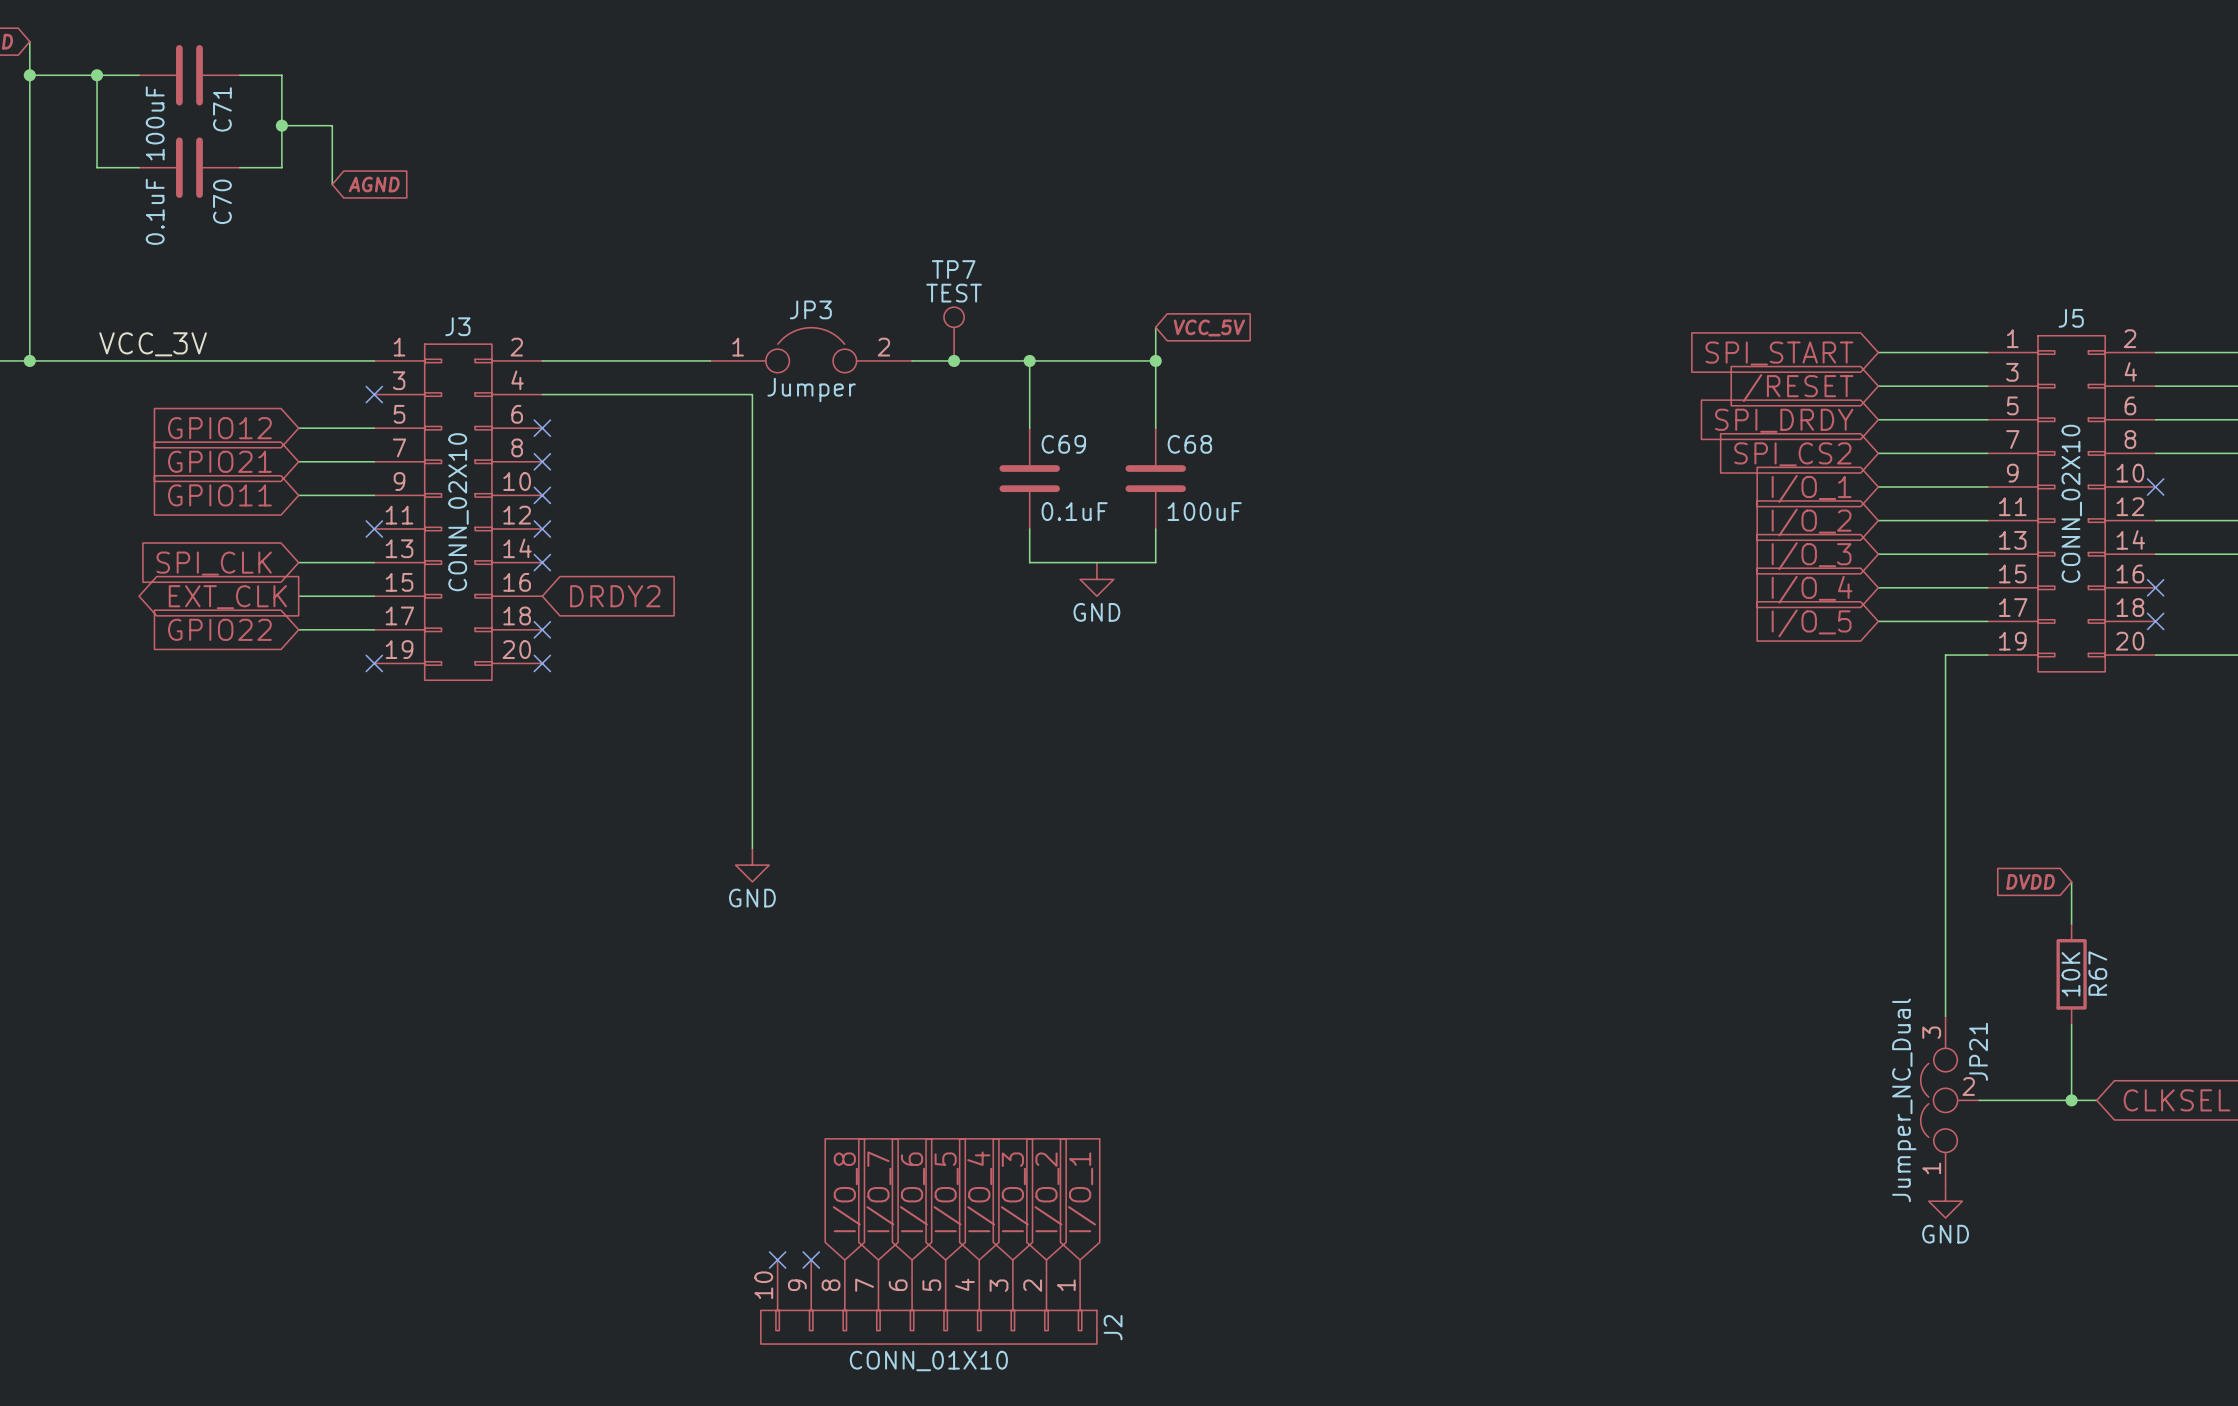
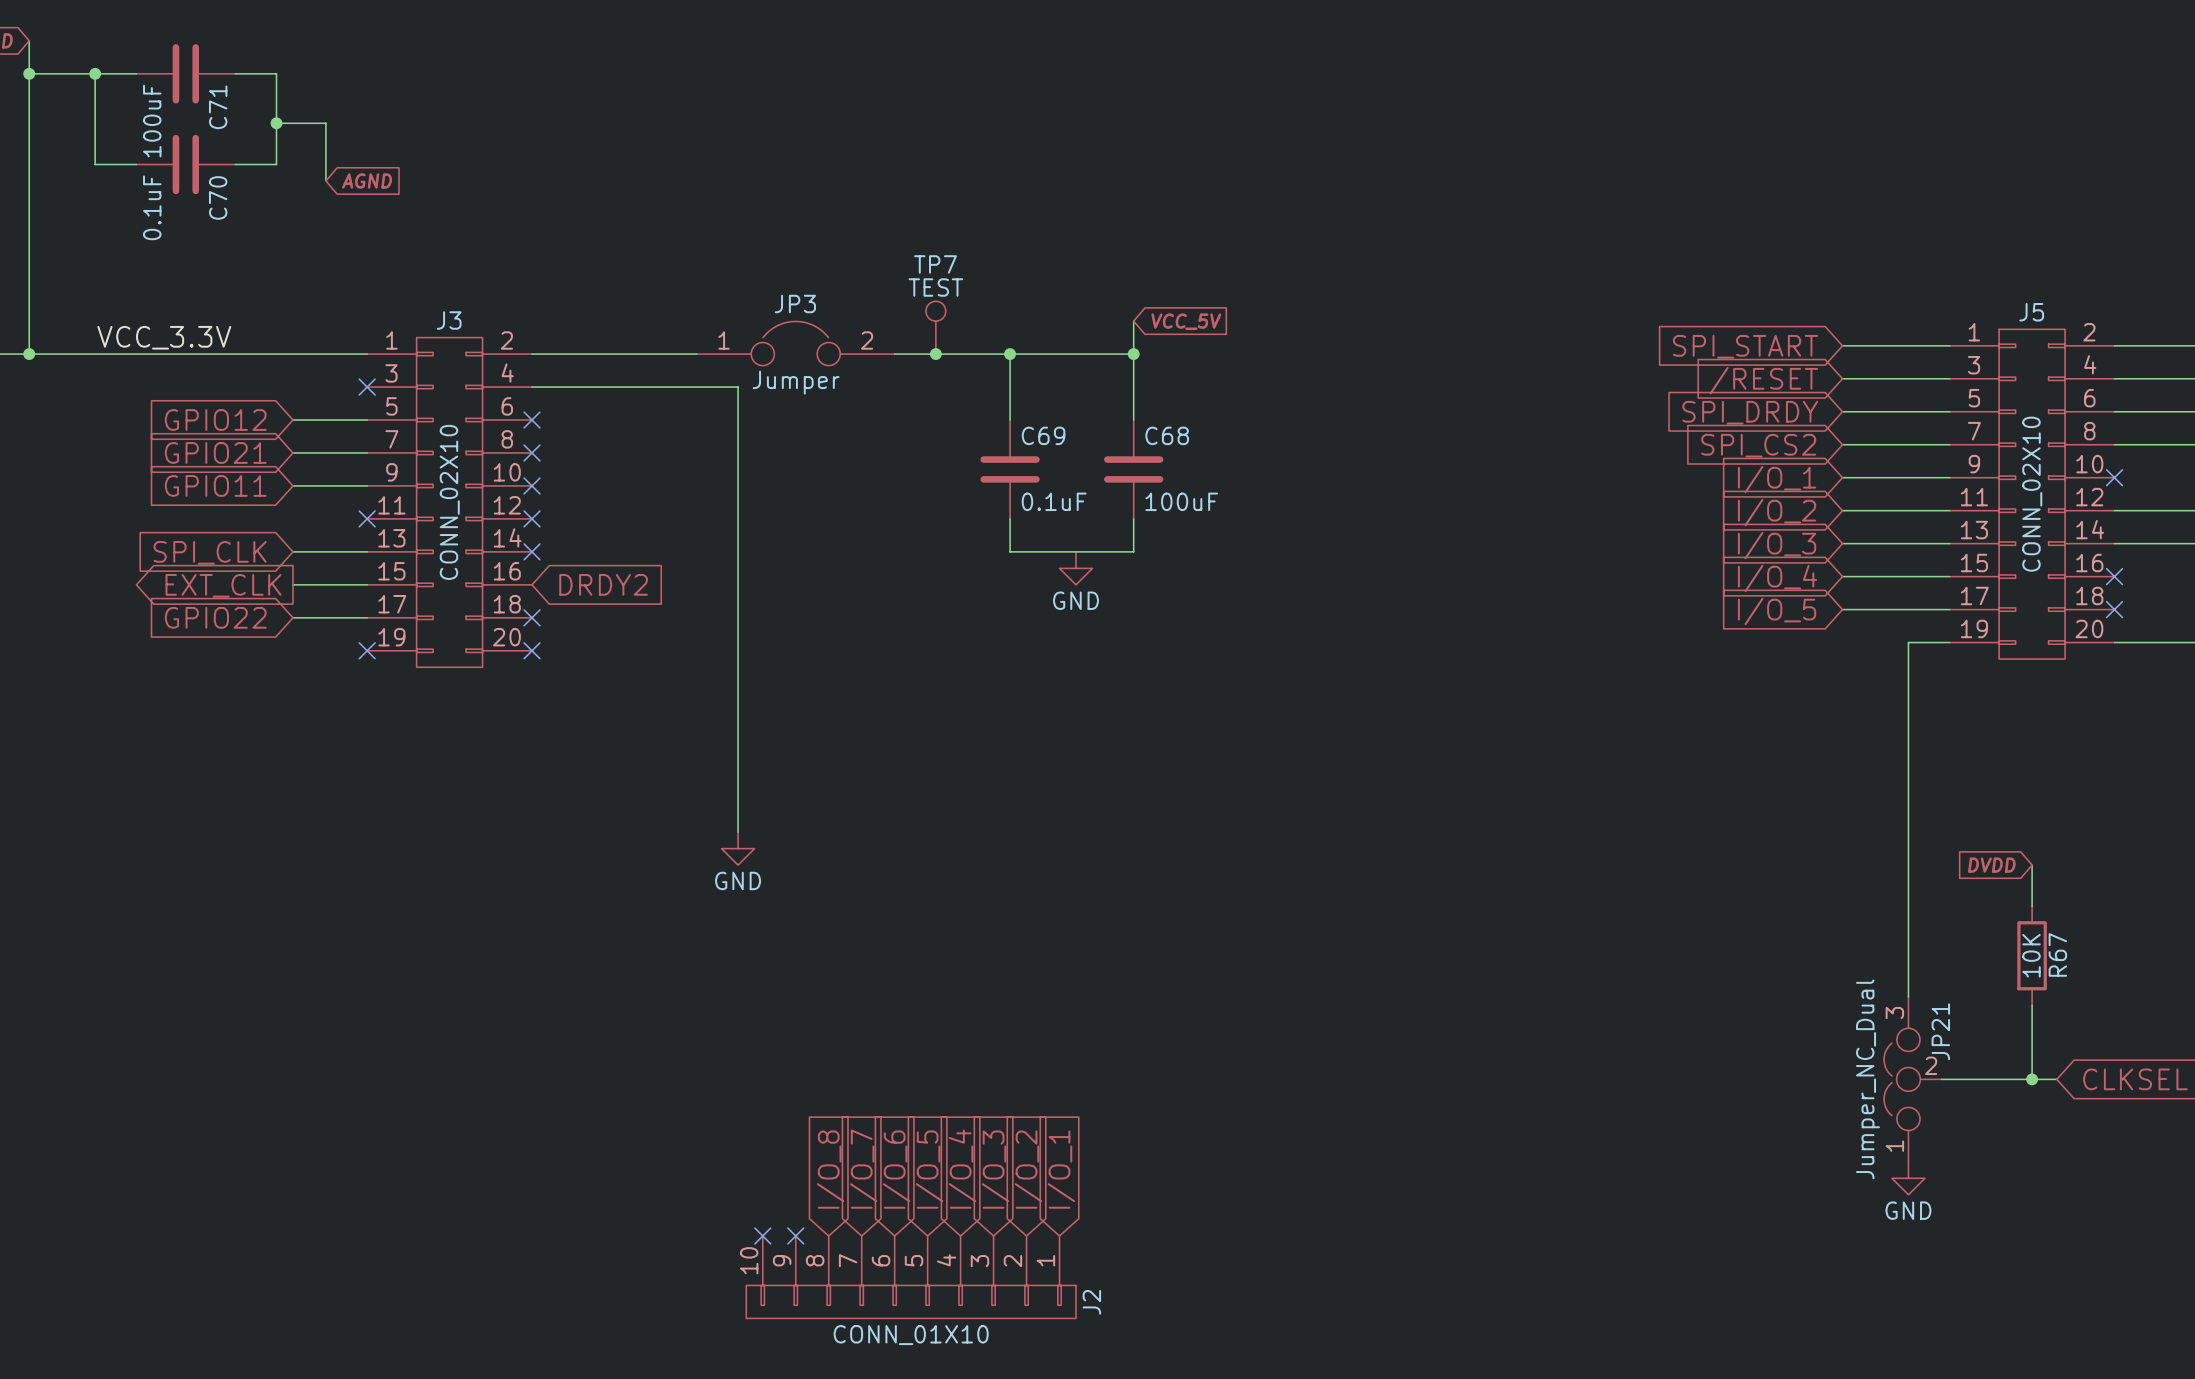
label: VCC_3V (153, 344) -> VCC_3.3V (164, 337)

